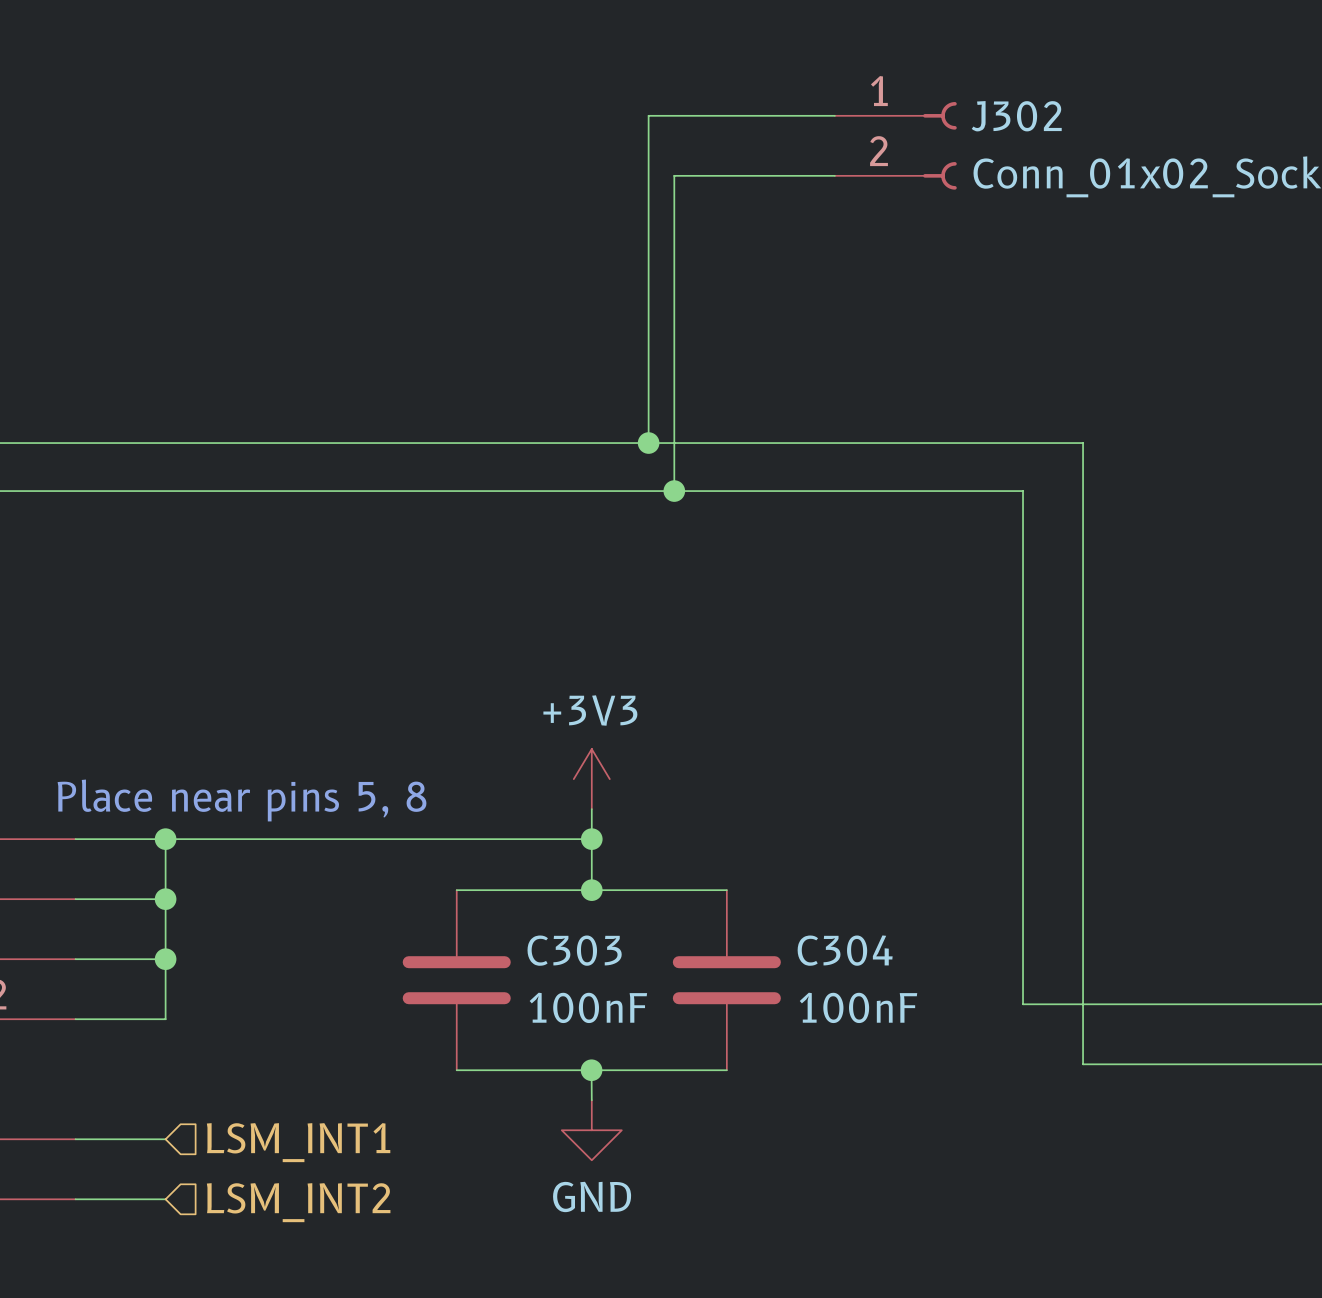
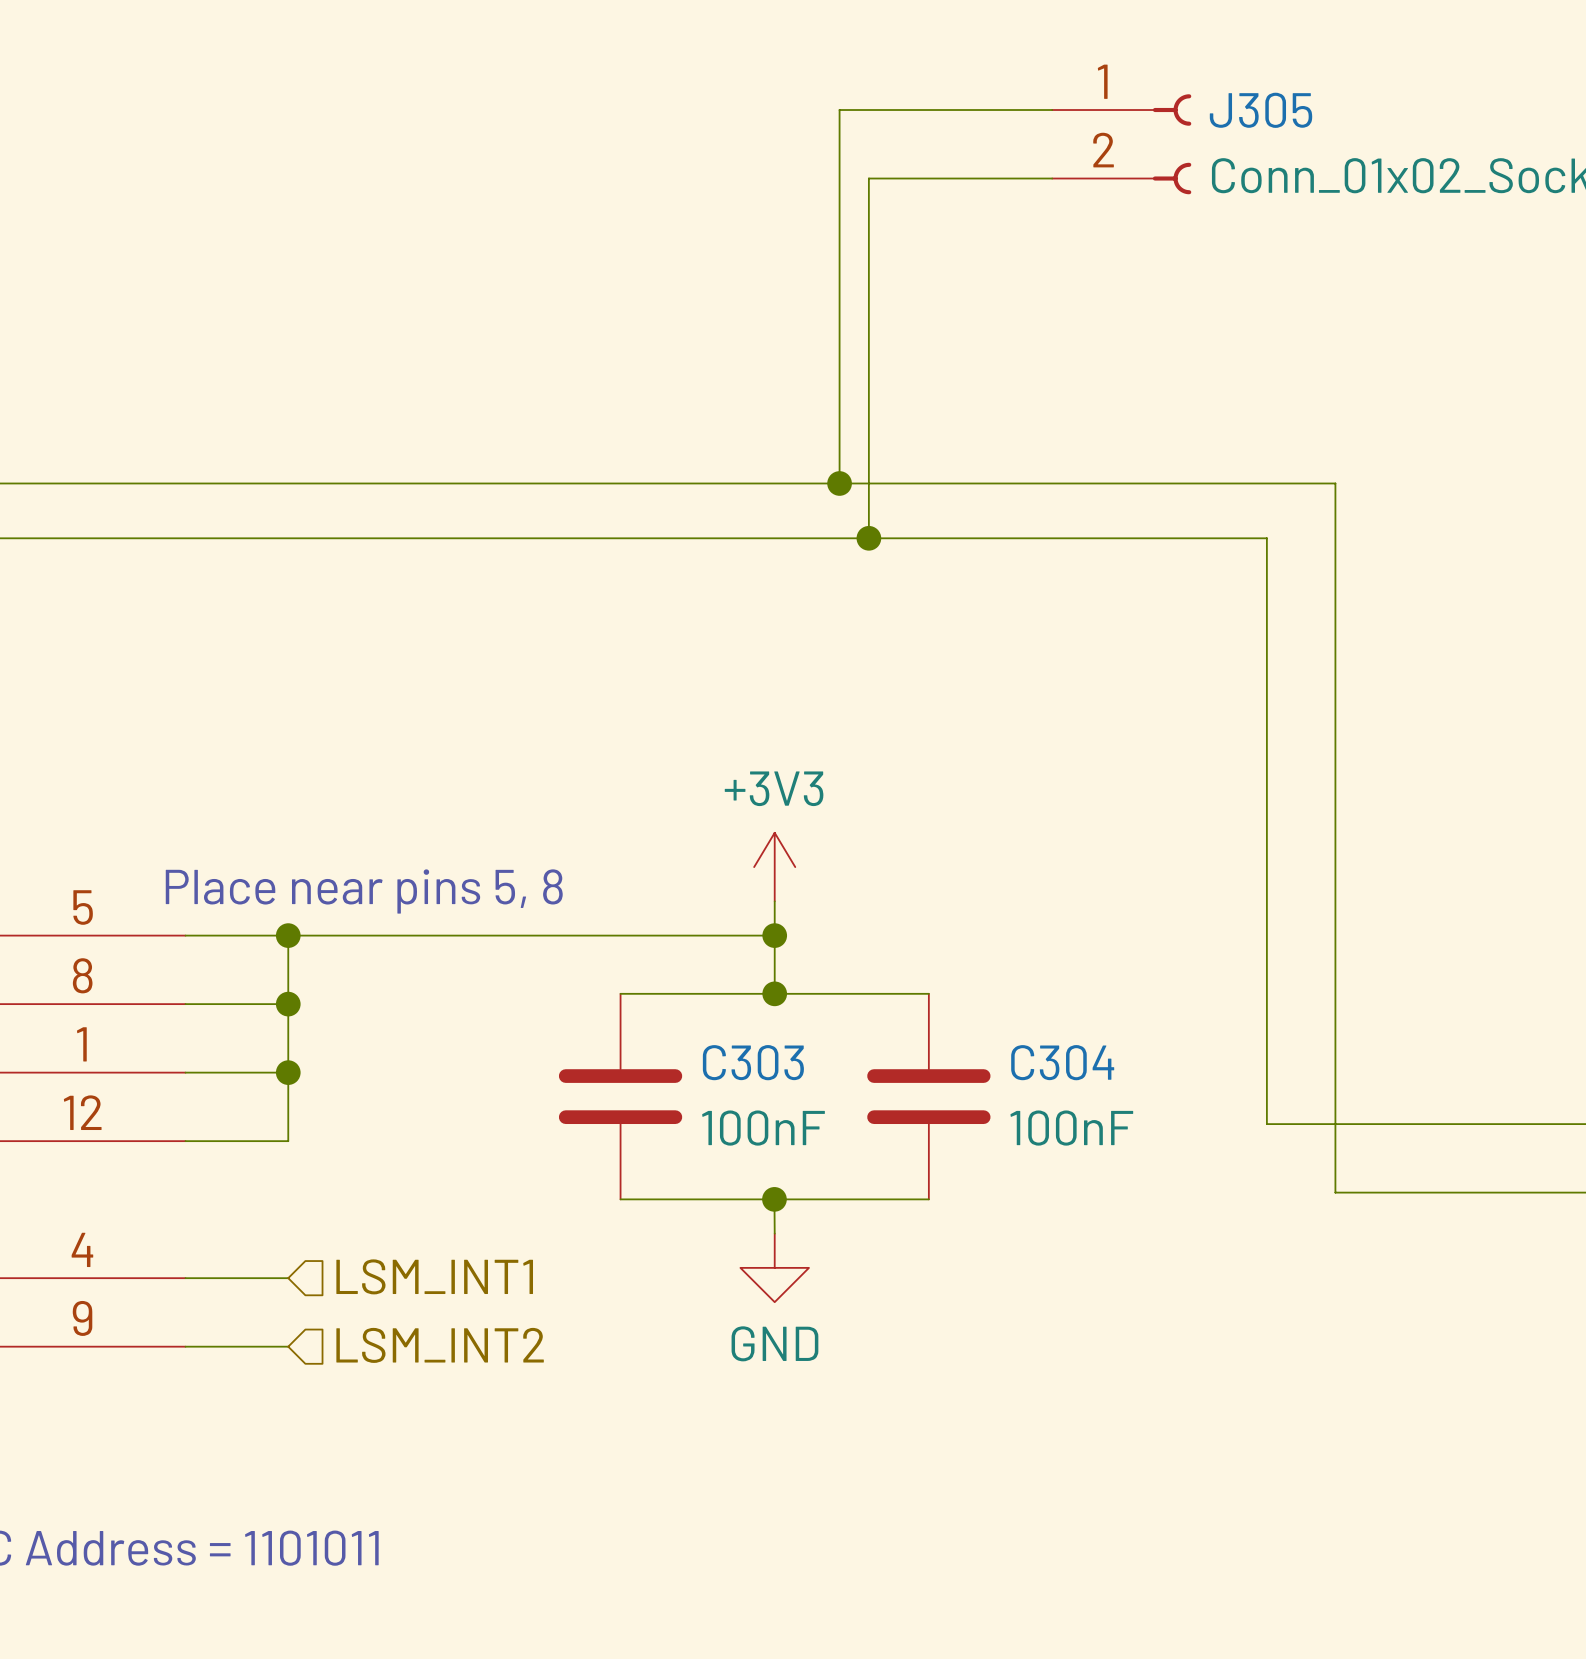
J302 name: J302 (1016, 116) -> J305 (1261, 110)

